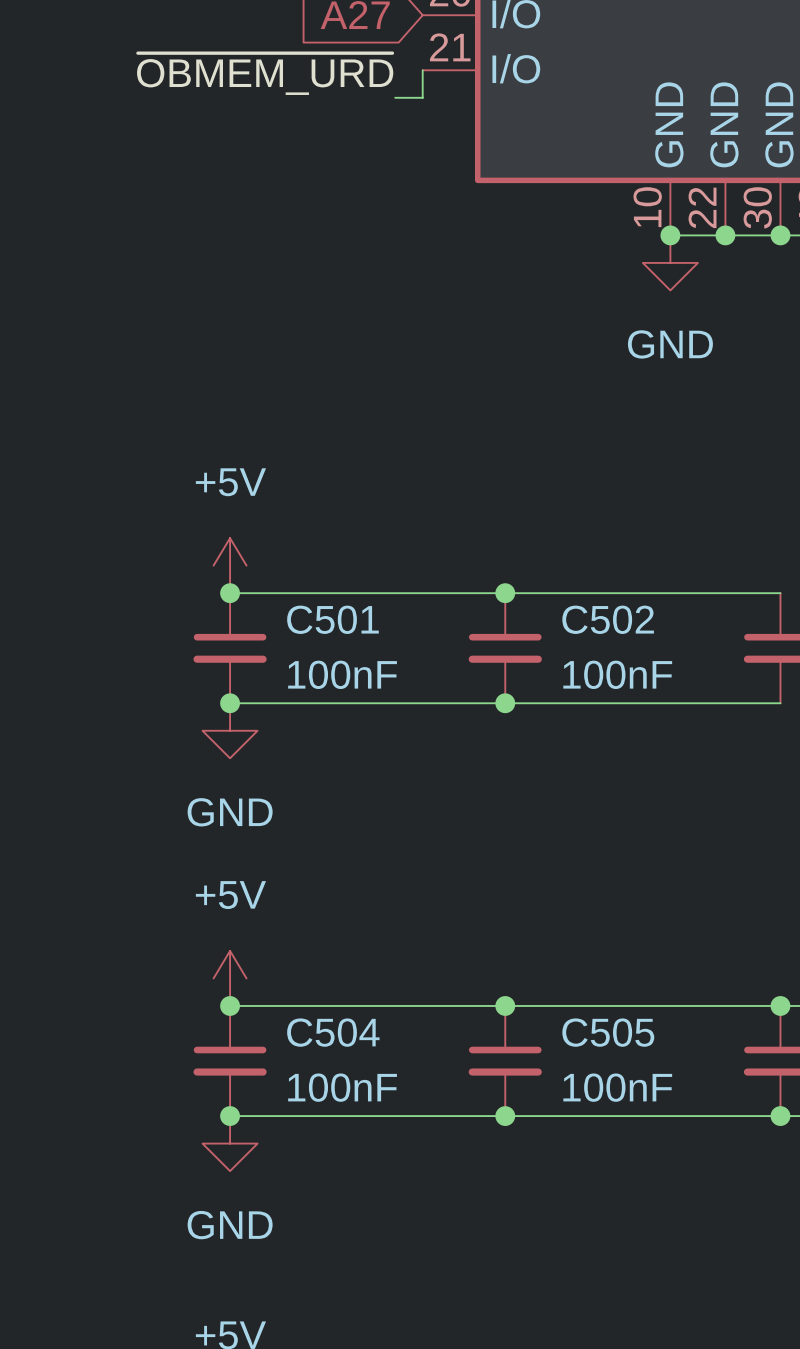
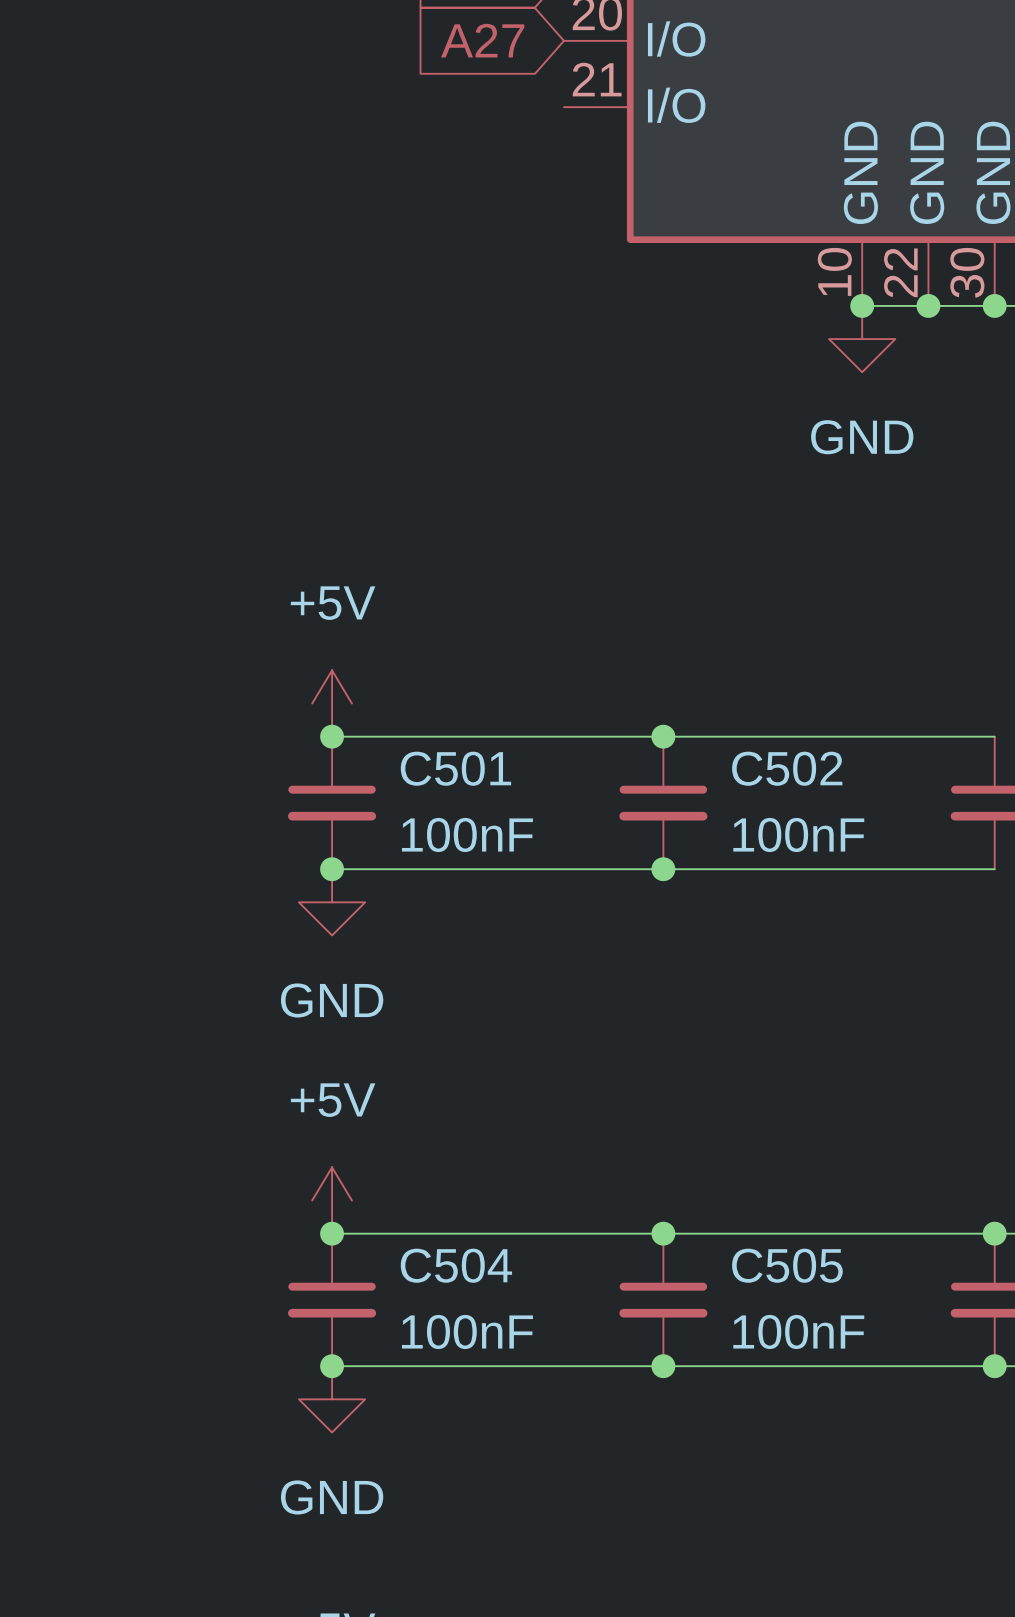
wire: (422, 70) (422, 97) (395, 97) -> none
label: ~{OBMEM_URD} (265, 74) -> none

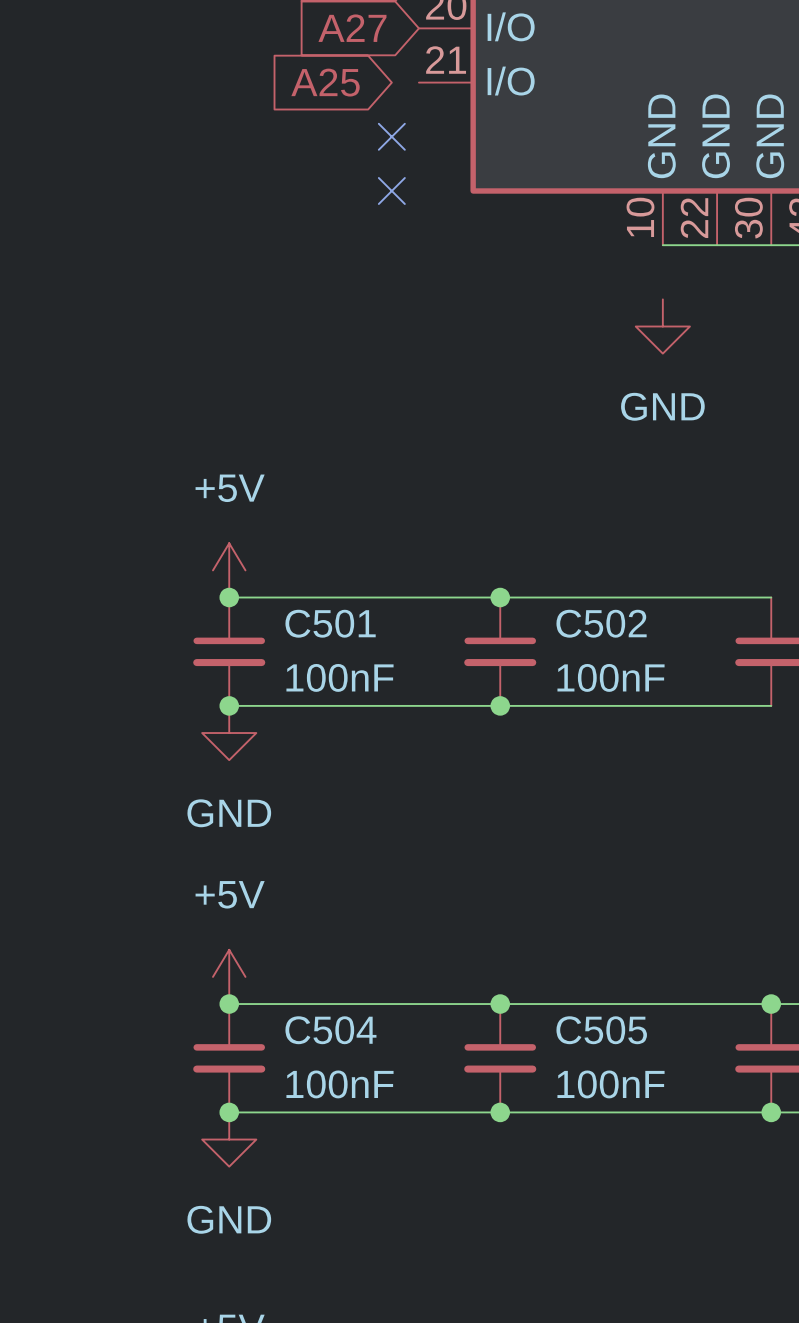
global label: none -> A25 (325, 82)
no-connect mark: none -> (391, 136)
no-connect mark: none -> (391, 190)
junction: (862, 305) -> none
junction: (928, 305) -> none
junction: (994, 305) -> none
power symbol position: GND (862, 339) -> GND (662, 326)

